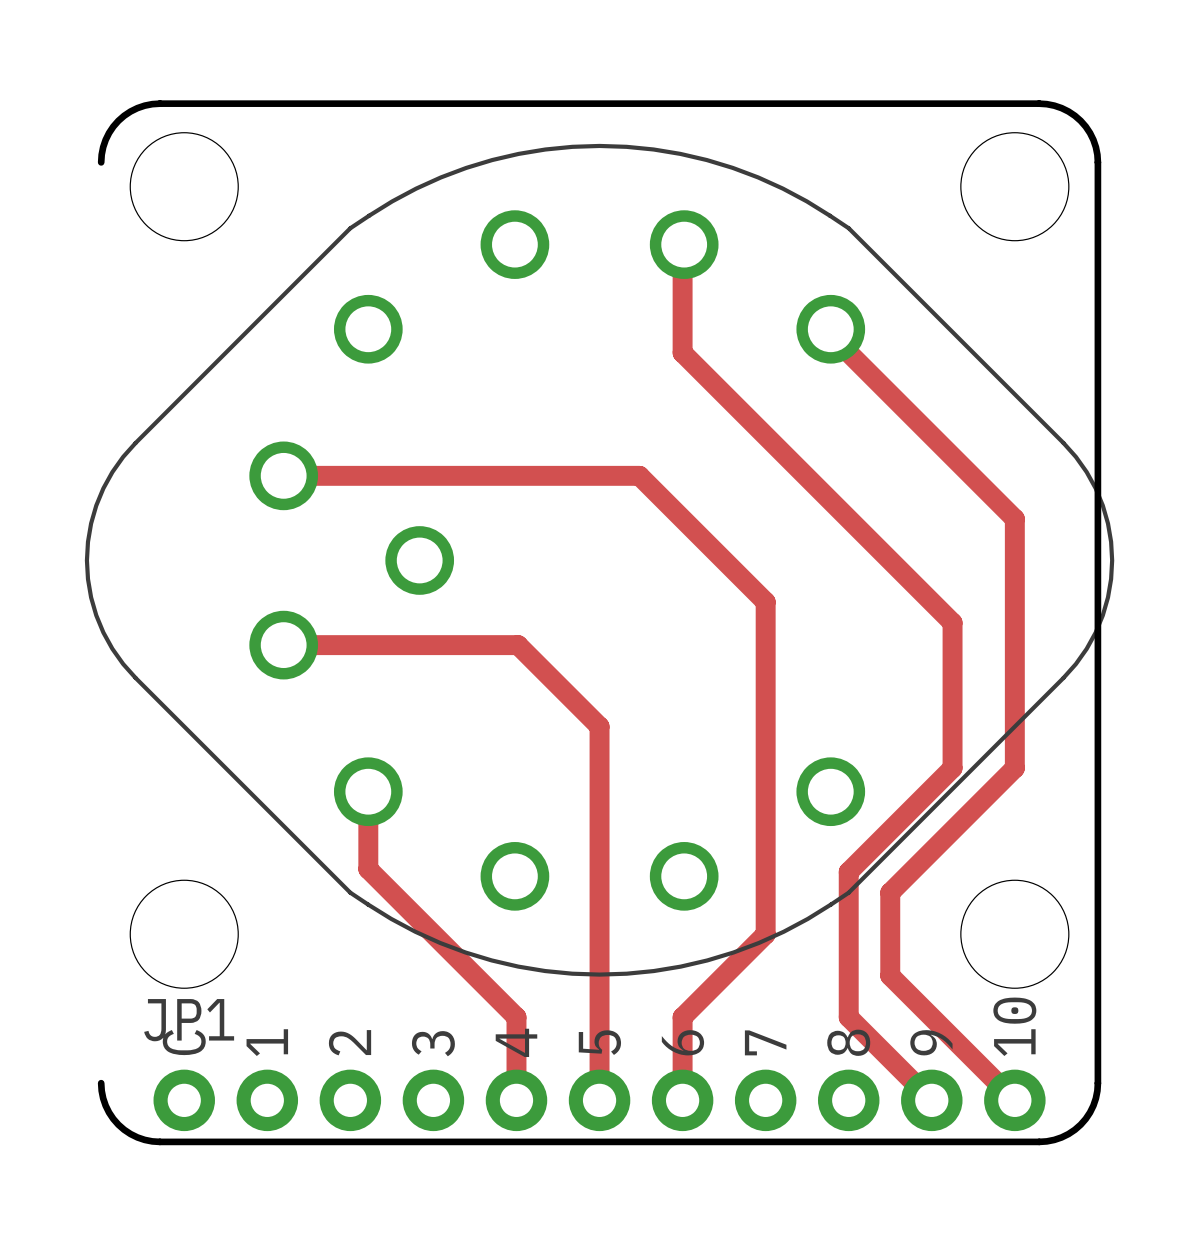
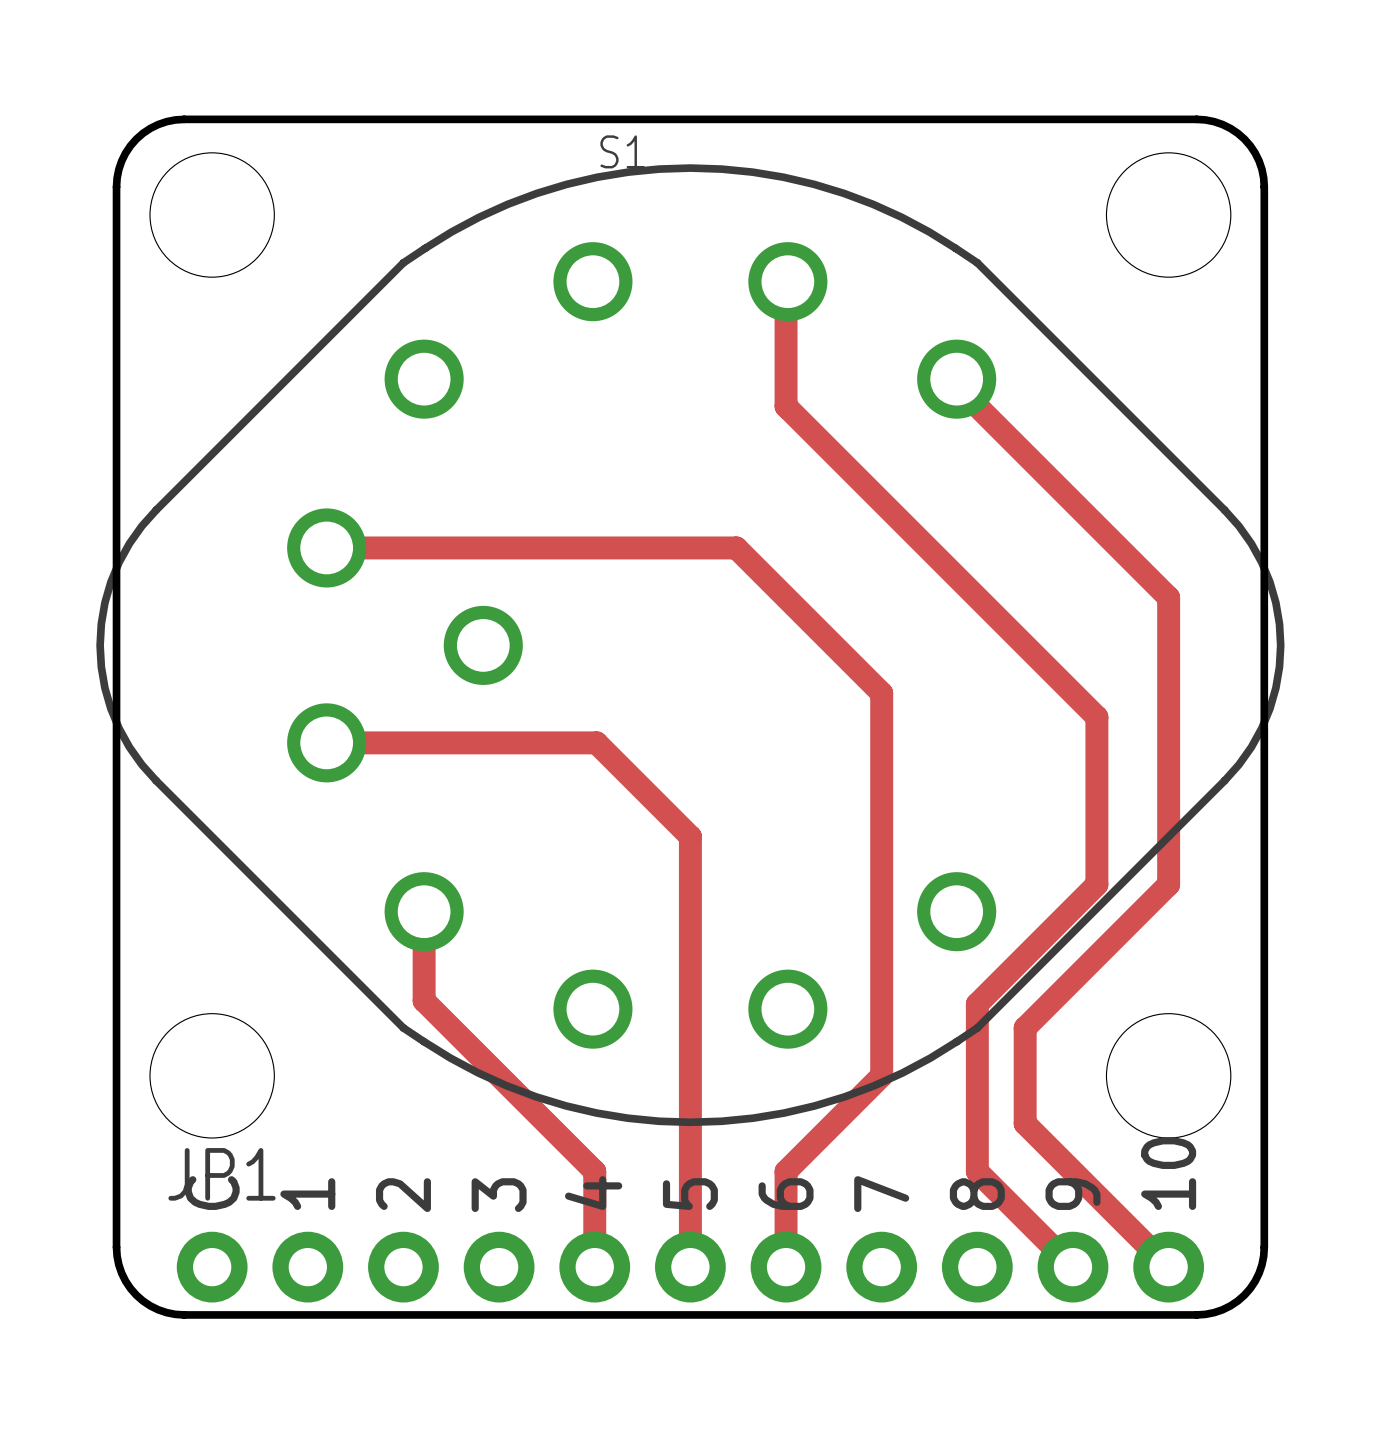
board edge: none -> (116, 186) (116, 1247)
part: (599, 560) -> none
S1: none -> (690, 645)

